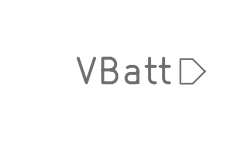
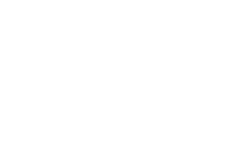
hierarchical label: VBatt (123, 70) -> none

